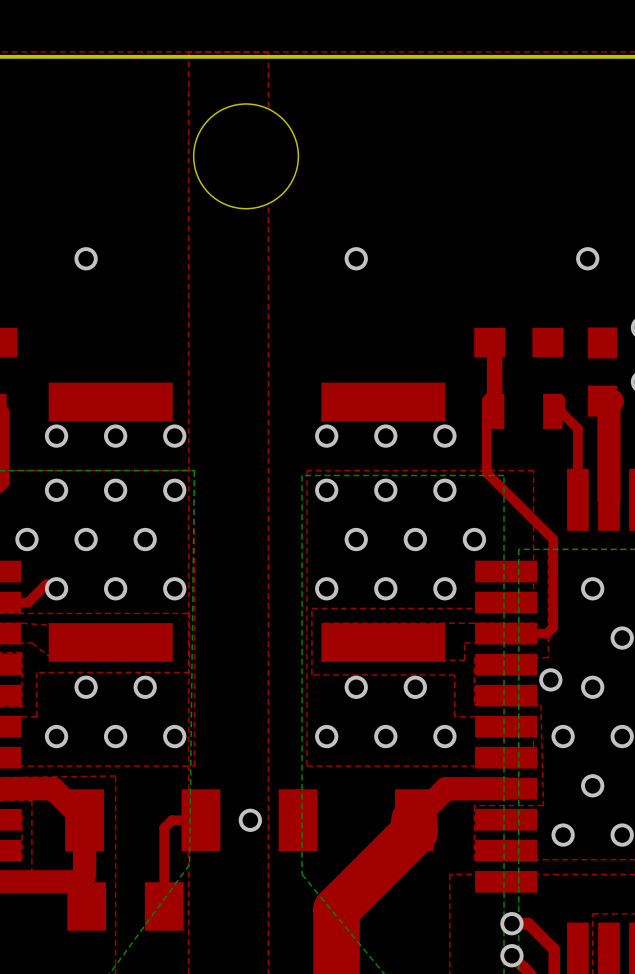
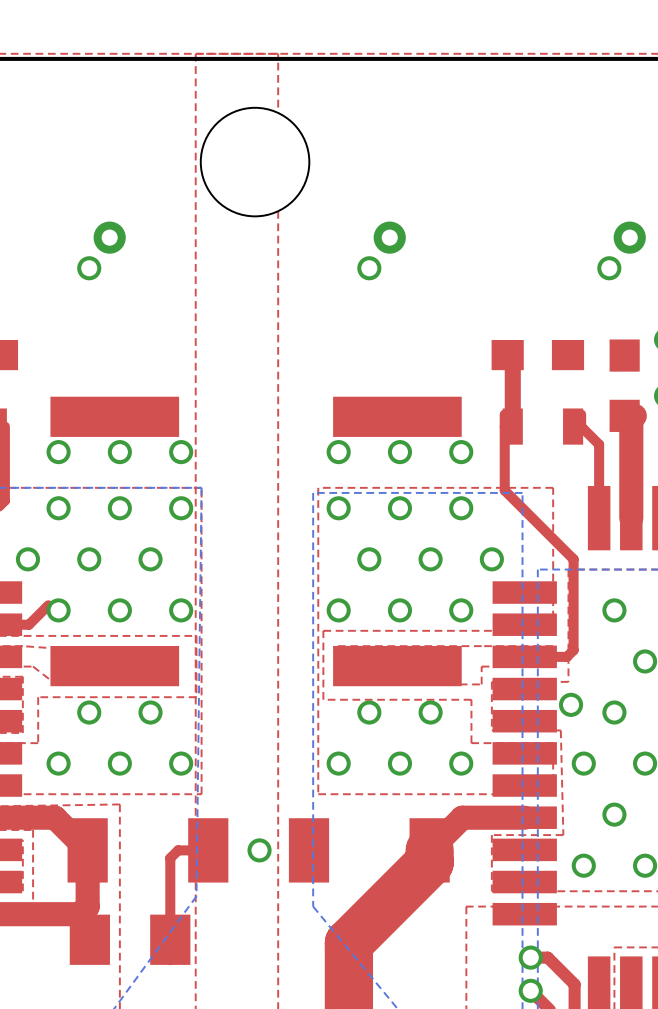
via: none -> (109, 237)
via: none -> (389, 237)
via: none -> (629, 237)

